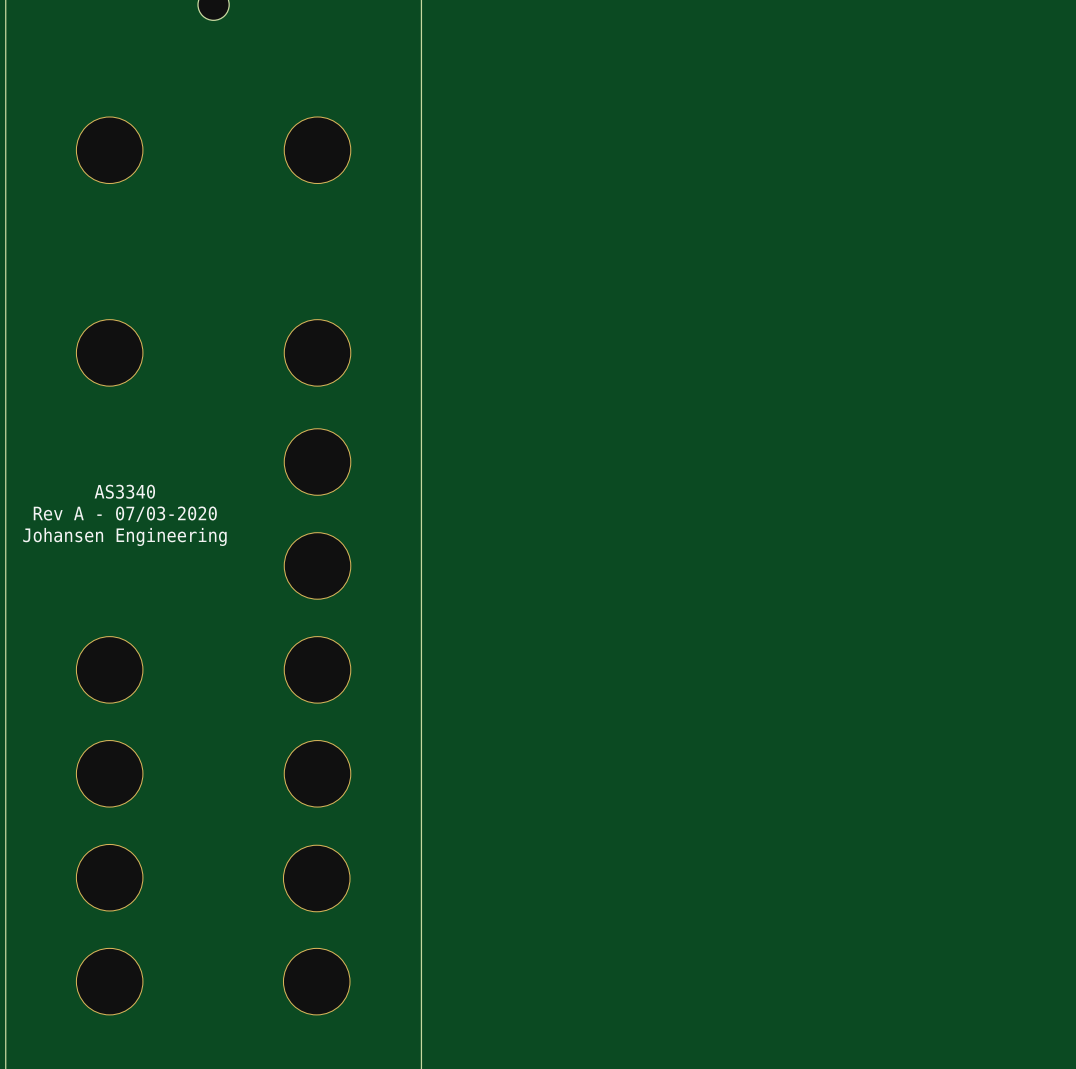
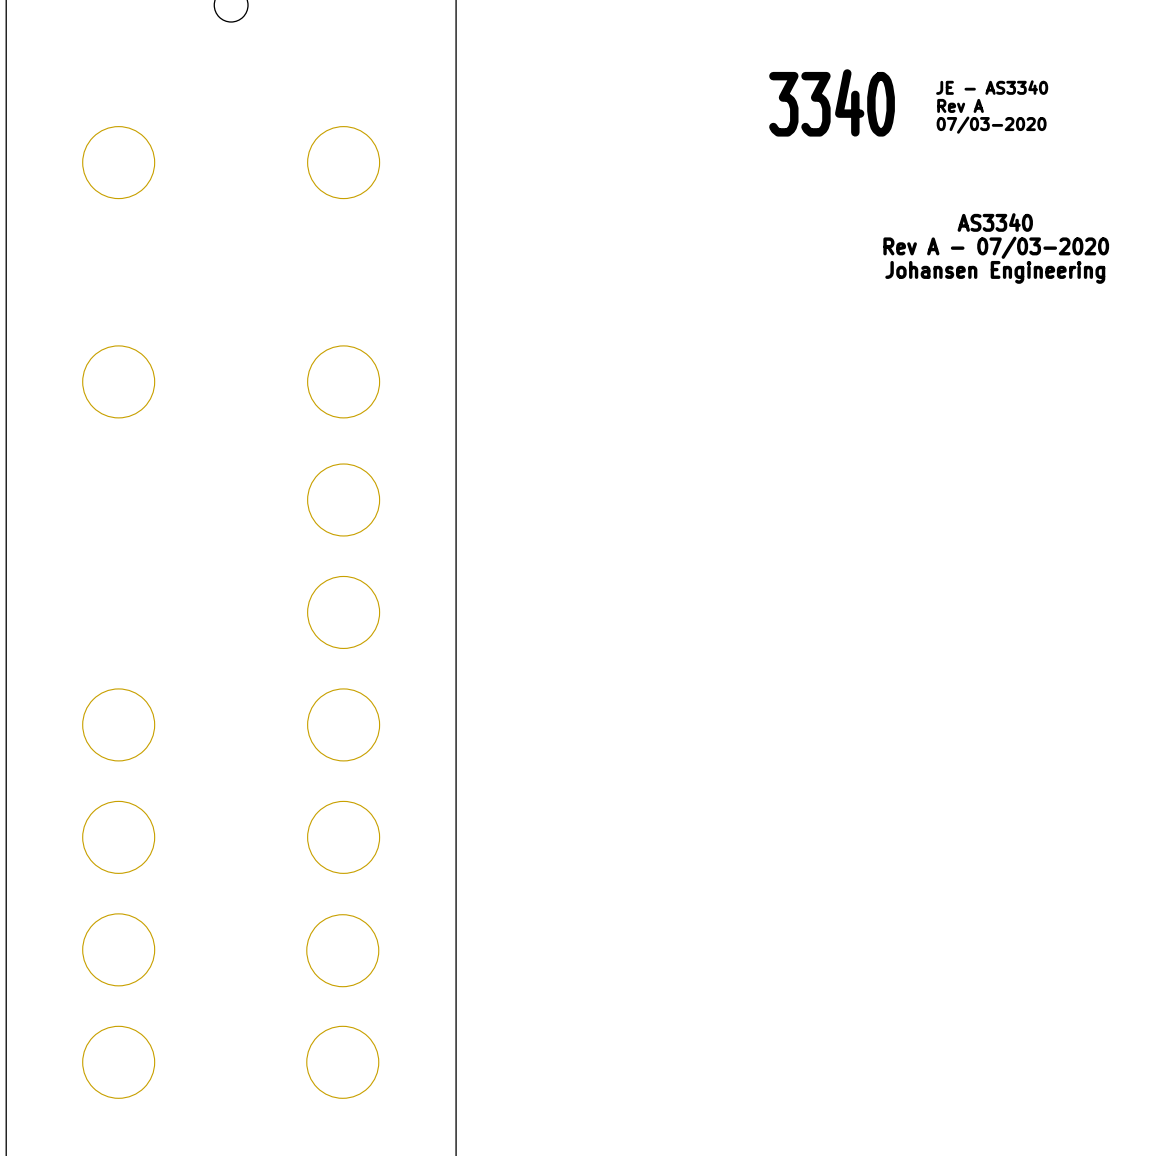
text: none -> JE - AS3340 (992, 87)
text: none -> 3340 (832, 102)
text: none -> Rev A (960, 105)
text: none -> 07/03-2020 (991, 125)
text: none -> AS3340 (995, 222)
text: none -> Rev A - 07/03-2020 (996, 247)
text: none -> Johansen Engineering (995, 272)
text: AS3340 (124, 491) -> none
text: Rev A - 07/03-2020 (125, 514) -> none
text: Johansen Engineering (124, 536) -> none

